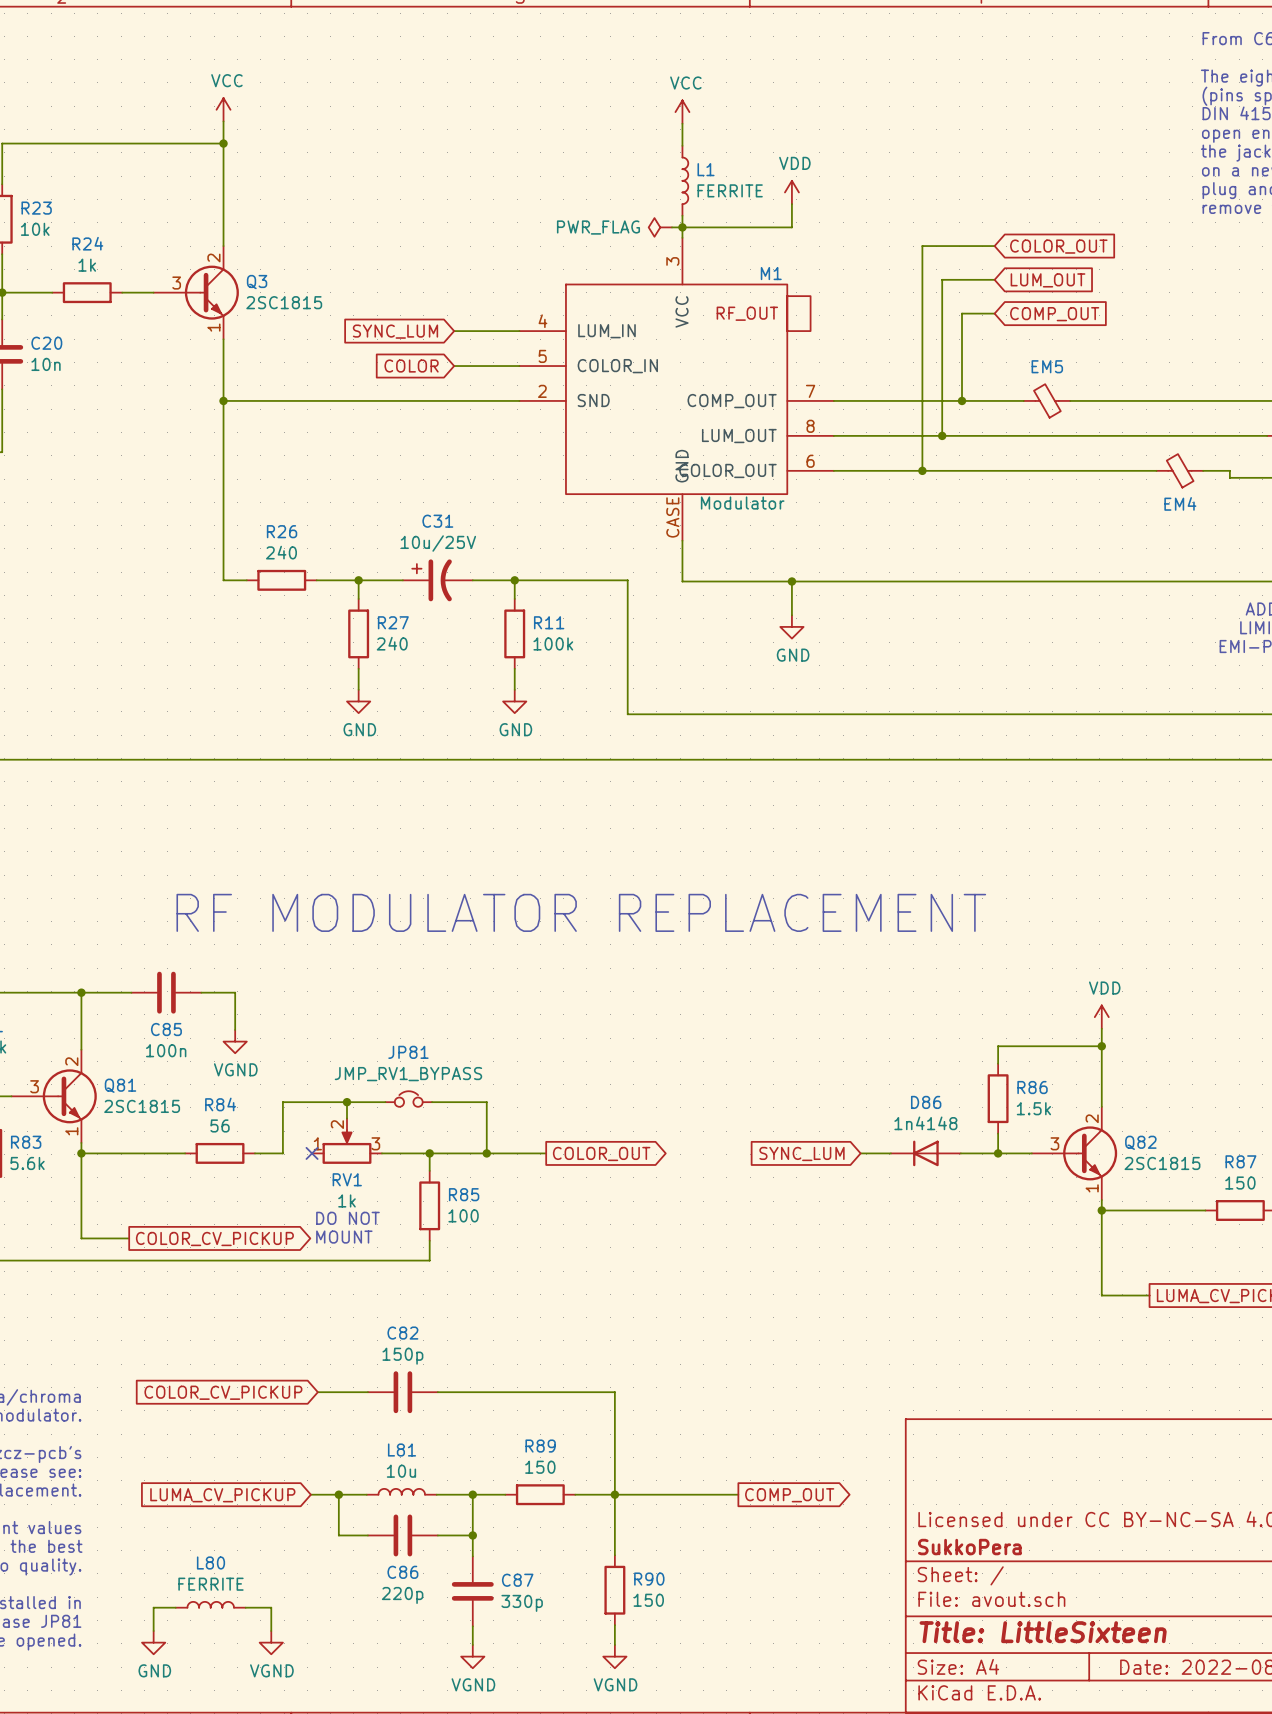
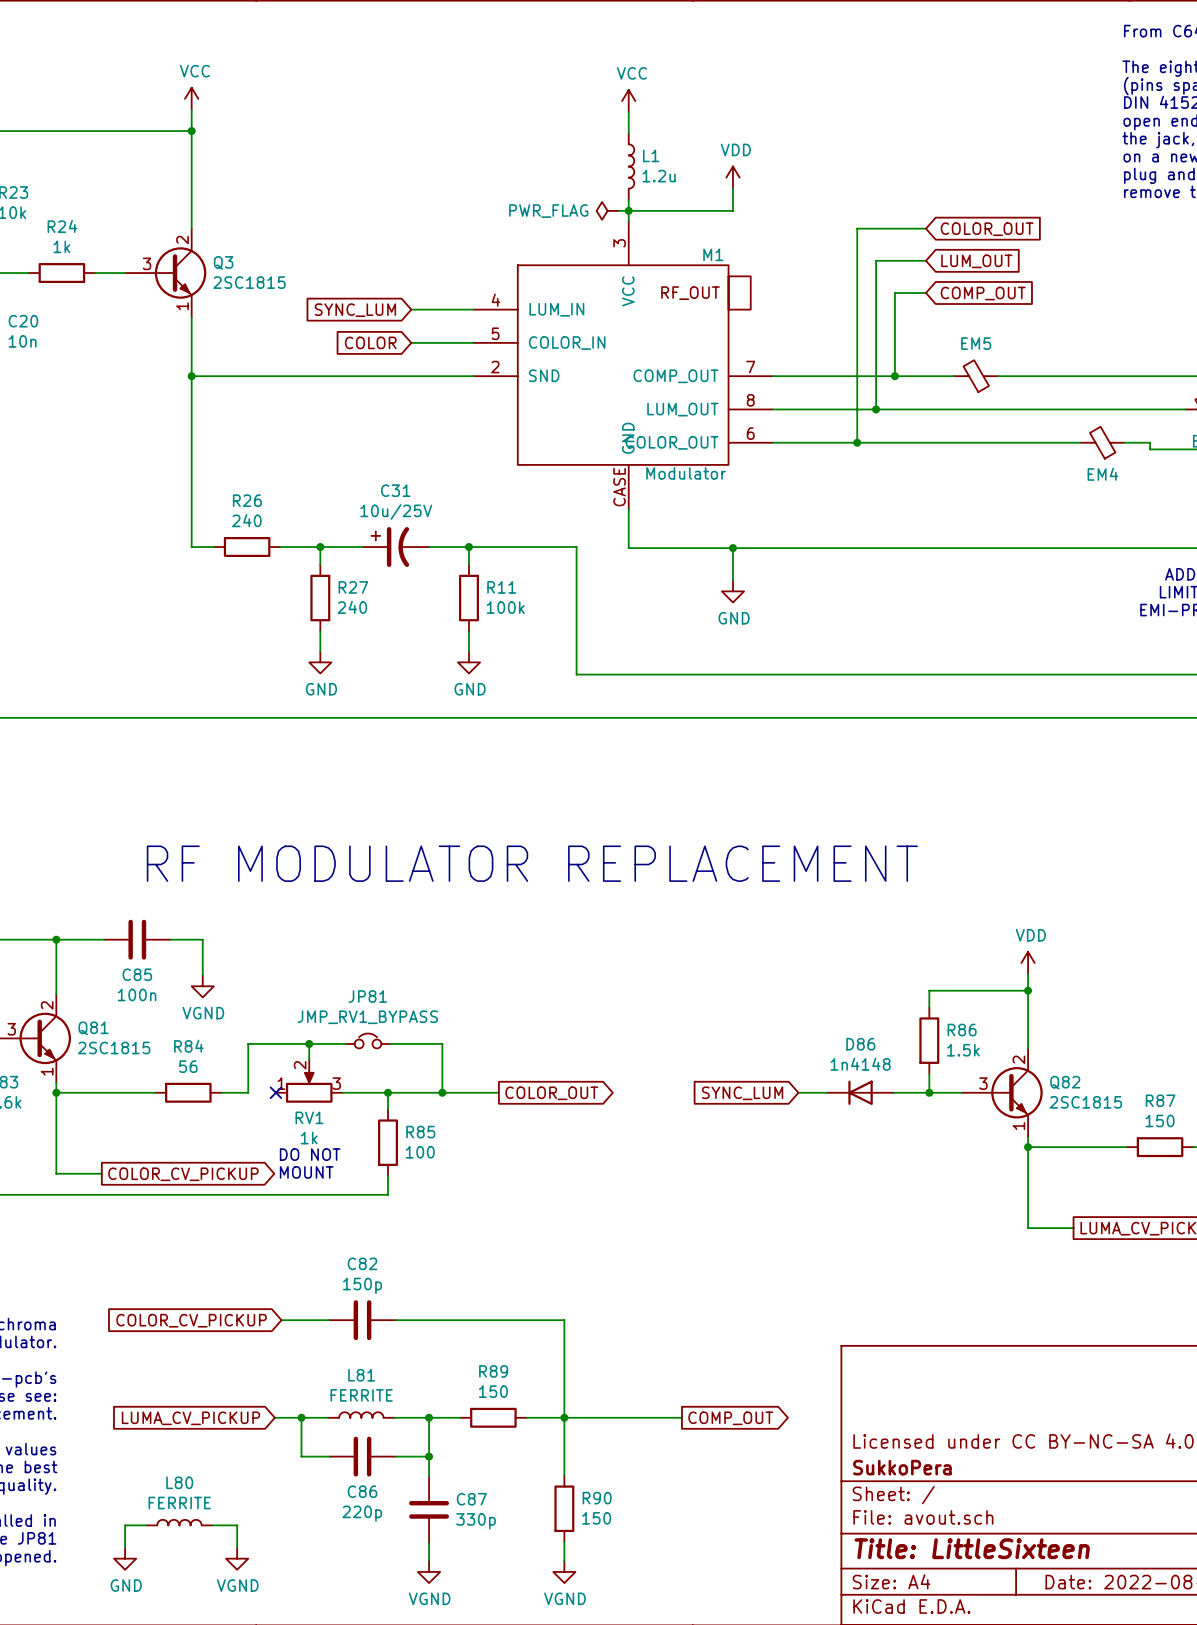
L1 value: FERRITE (730, 190) -> 1.2u (659, 176)
L81 value: 10u (401, 1471) -> FERRITE (361, 1395)

